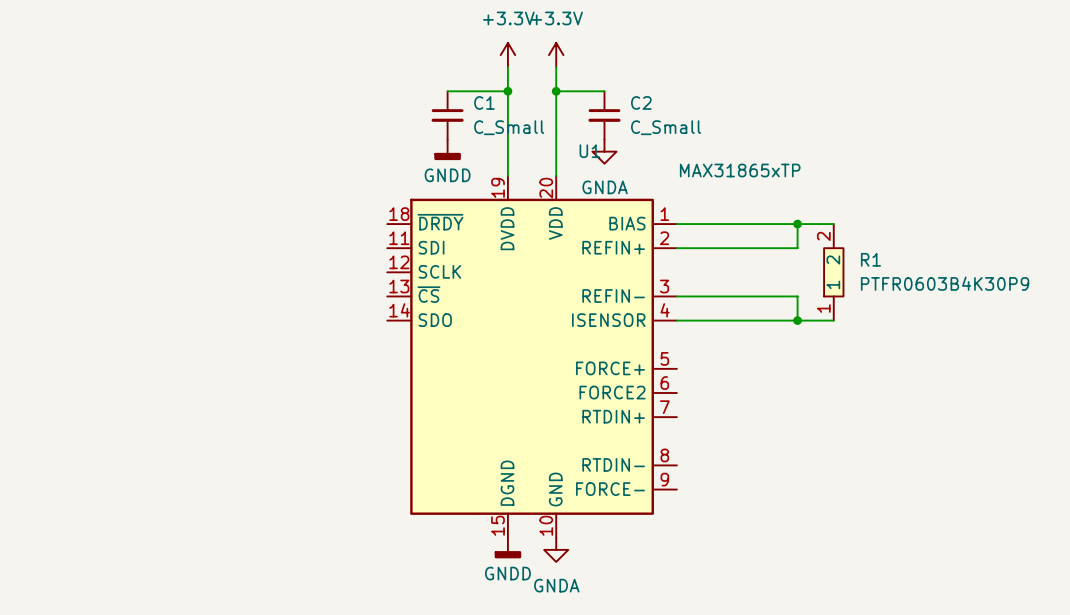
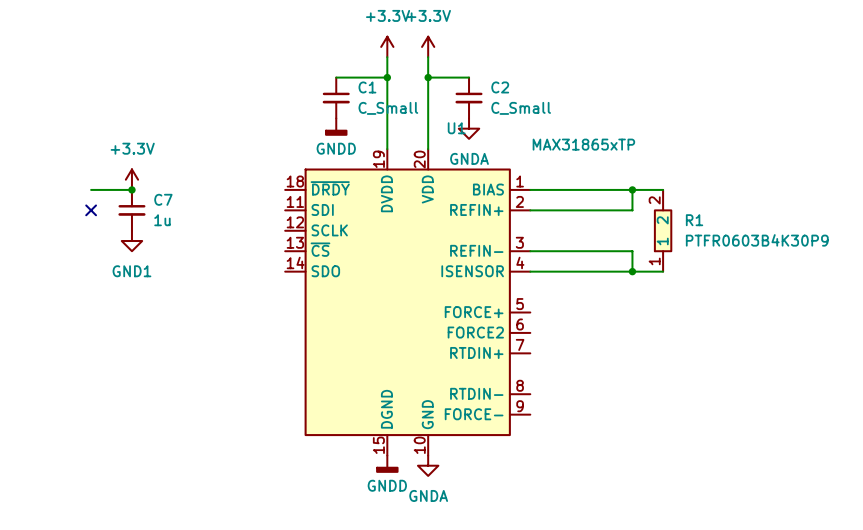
power symbol: none -> +3.3V (131, 179)
wire: none -> (91, 189) (131, 189)
junction: none -> (131, 189)
no-connect mark: none -> (91, 210)
C7: none -> 1u (131, 210)
power symbol: none -> GND1 (131, 241)

